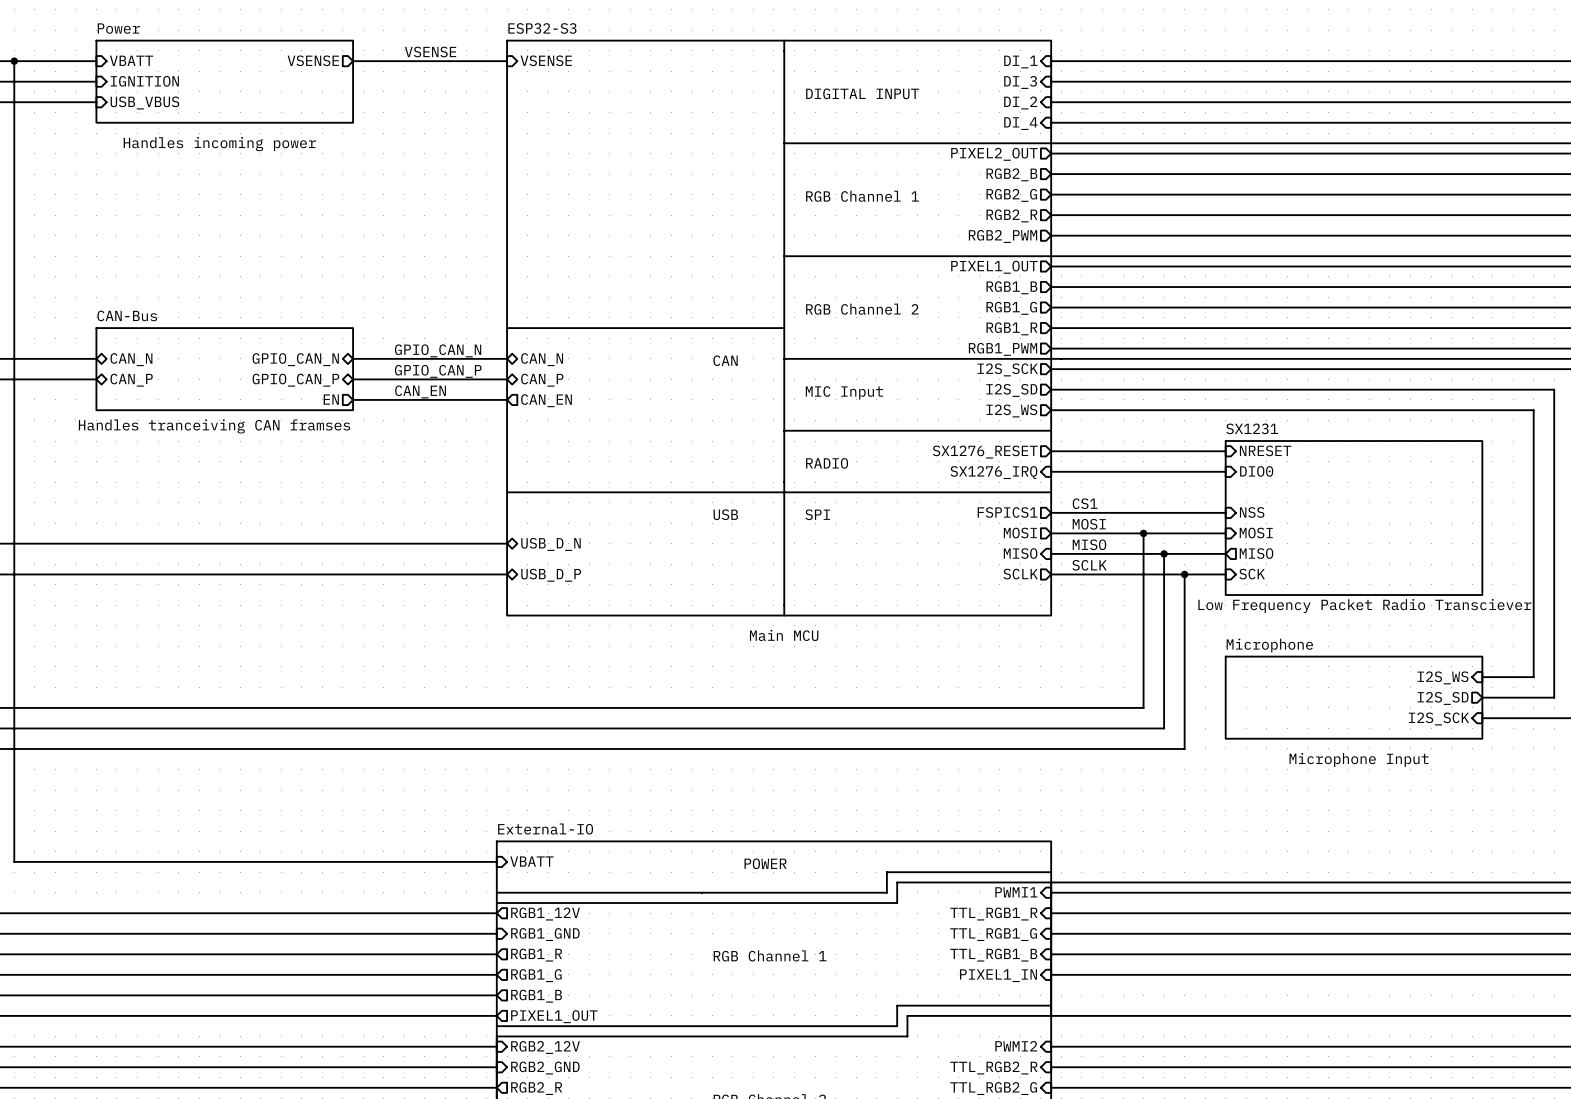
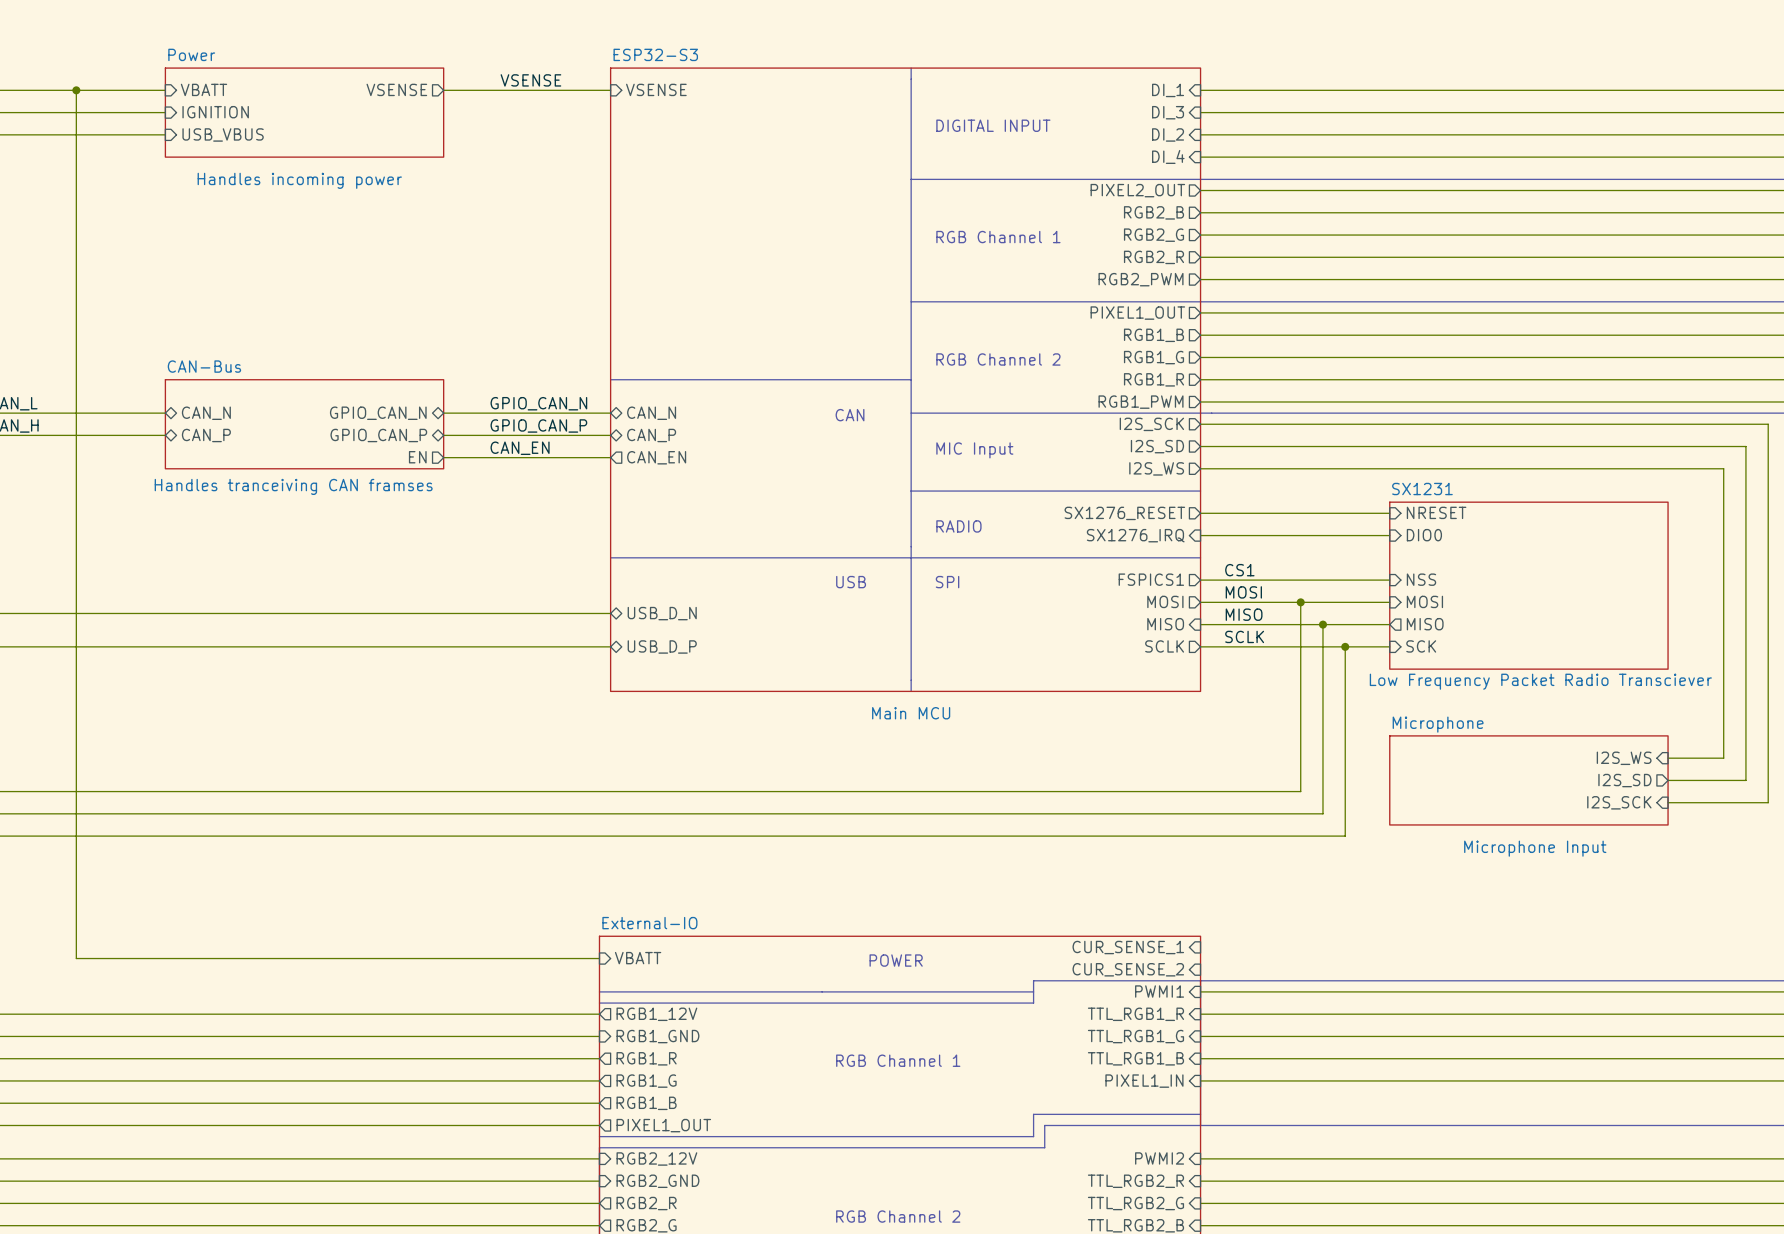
sheet pin: none -> CUR_SENSE_1 (1128, 947)
sheet pin: none -> CUR_SENSE_2 (1128, 969)
line: (1051, 872) (886, 872) (886, 892) -> (1033, 991) (1022, 991)

